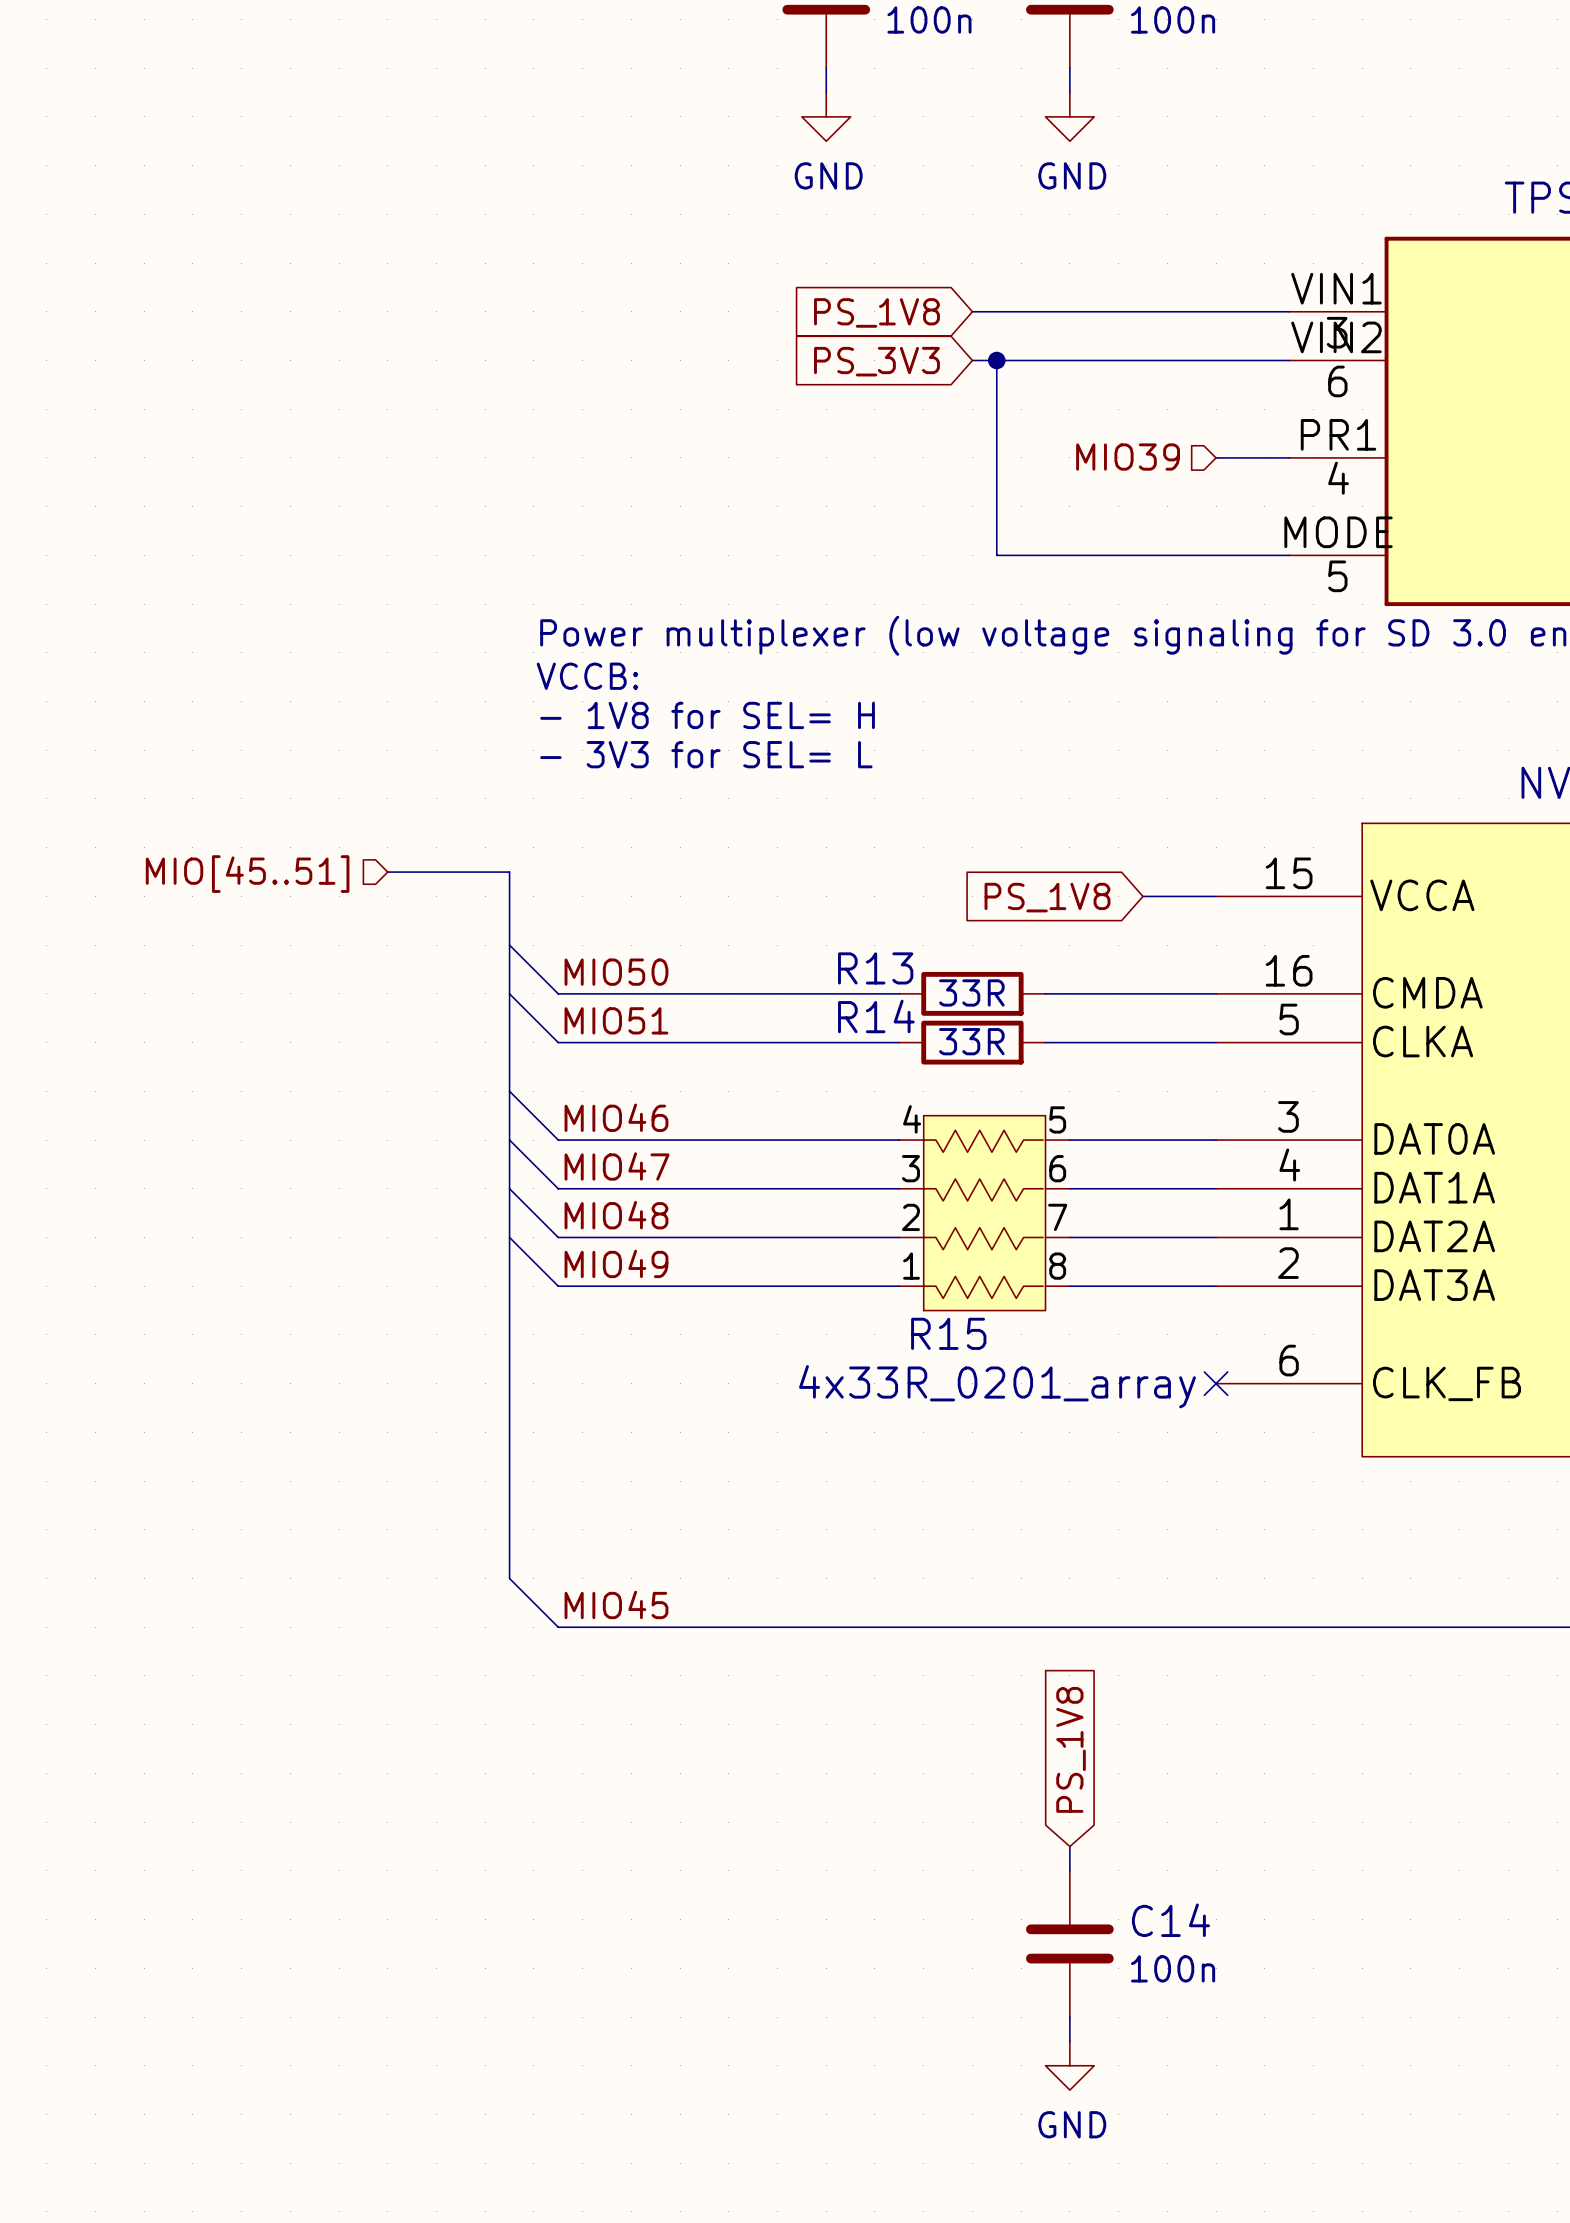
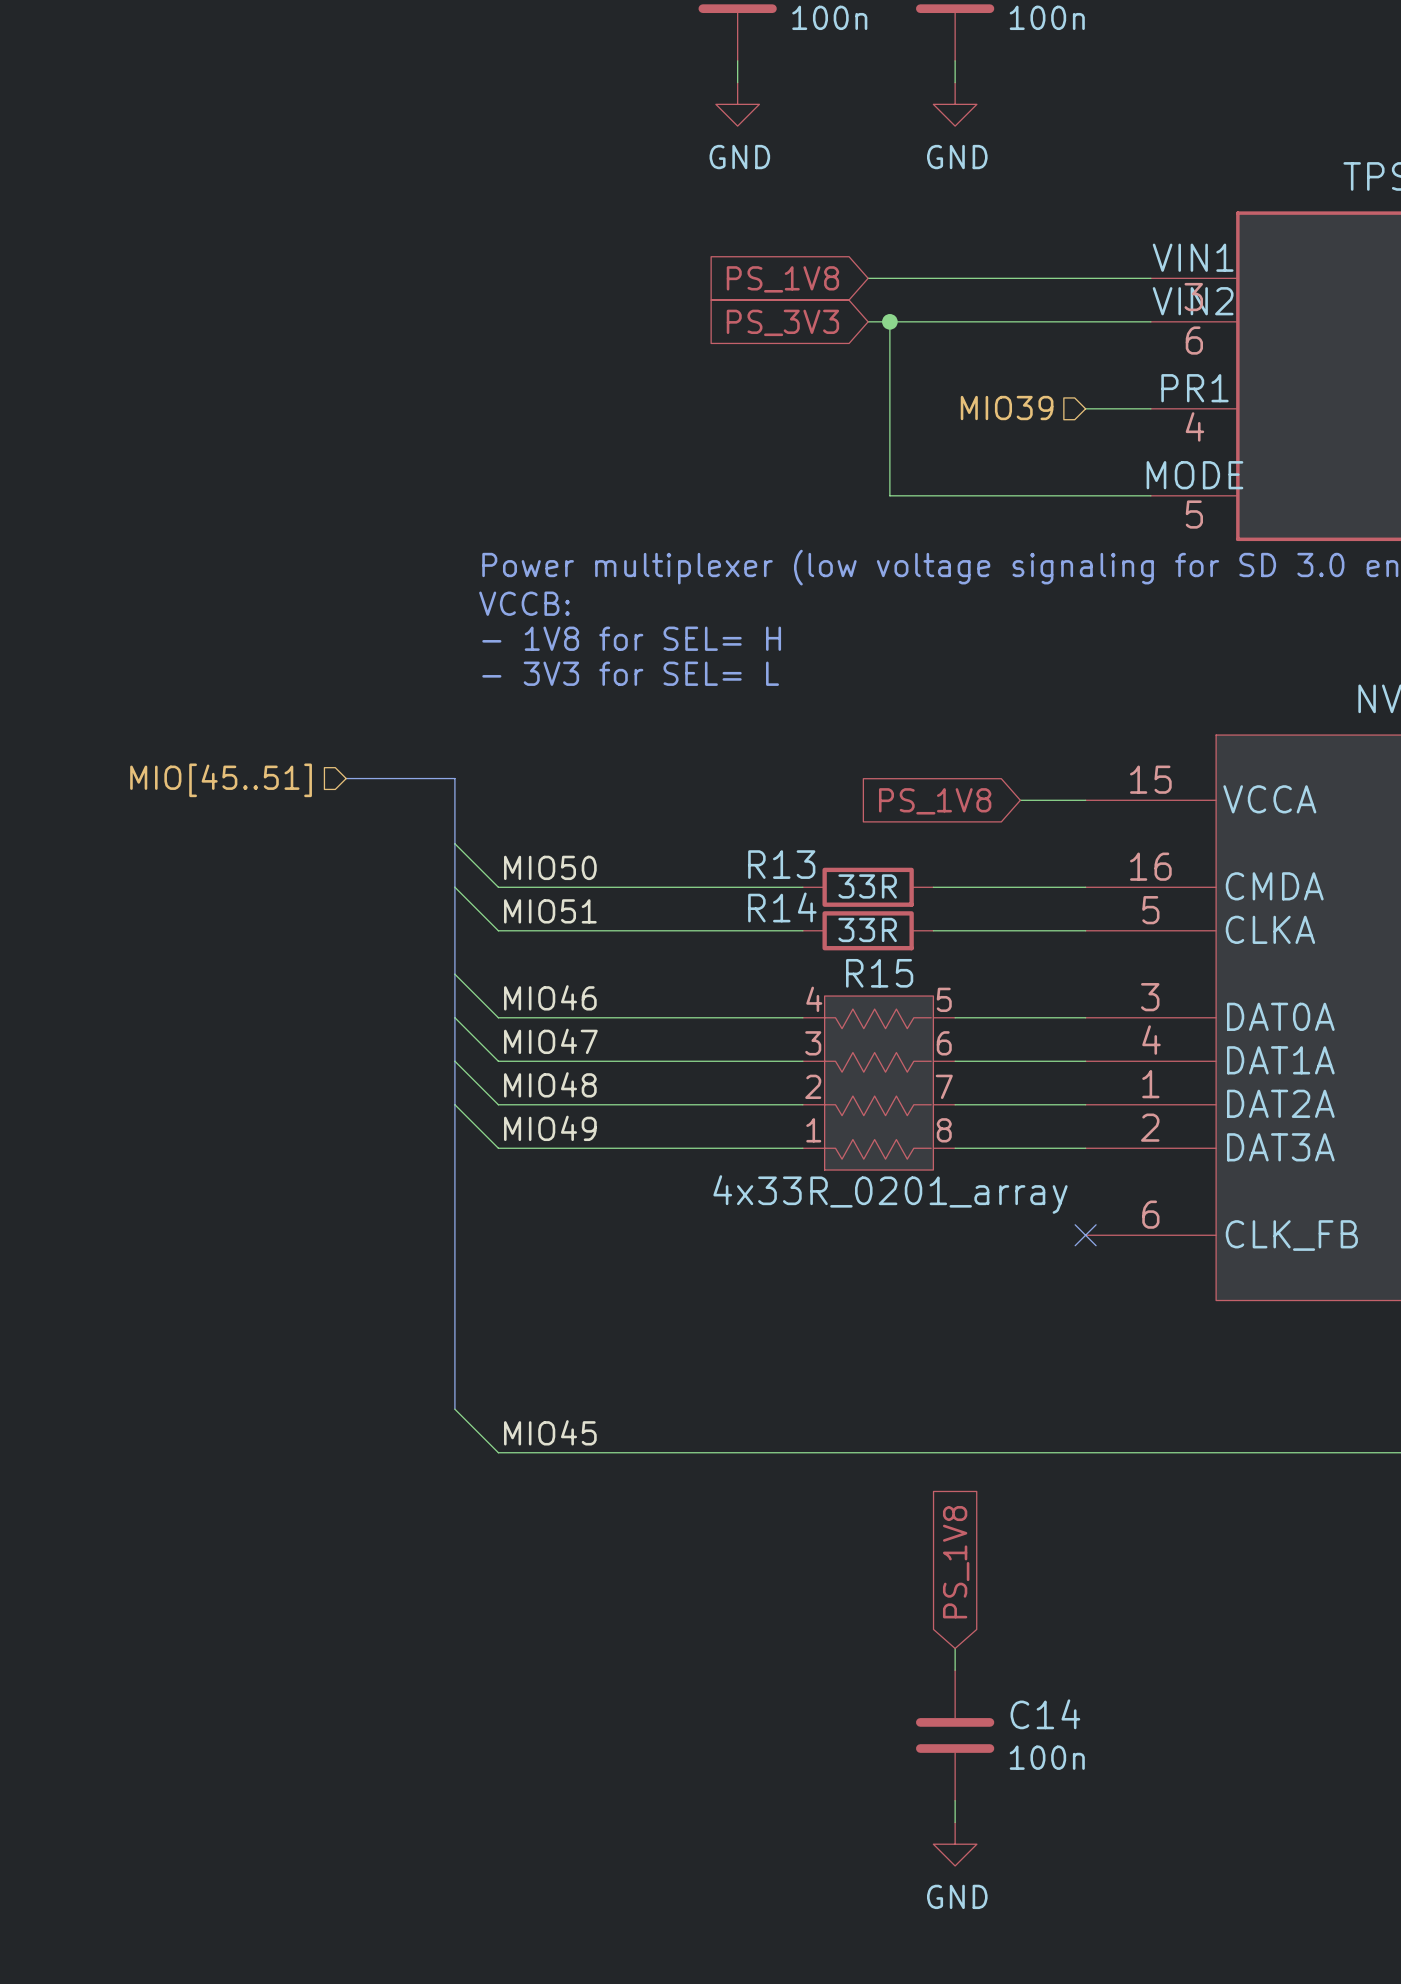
R15 name position: R15 (948, 1333) -> R15 (879, 973)
R15 value position: 4x33R_0201_array (997, 1386) -> 4x33R_0201_array (890, 1194)

